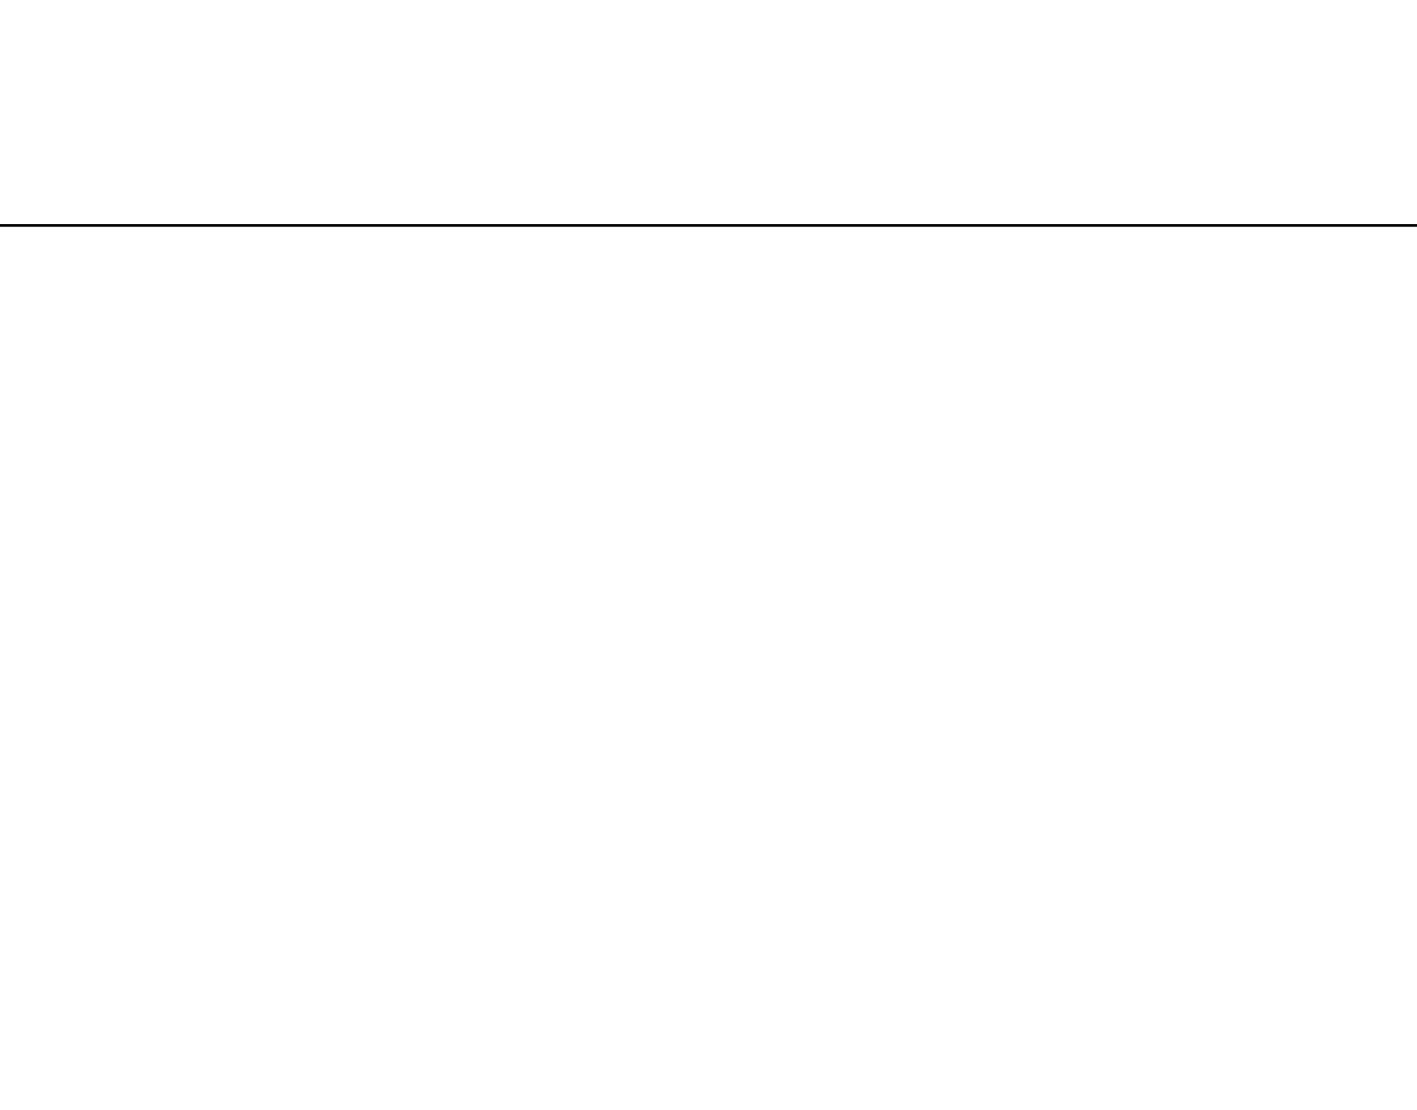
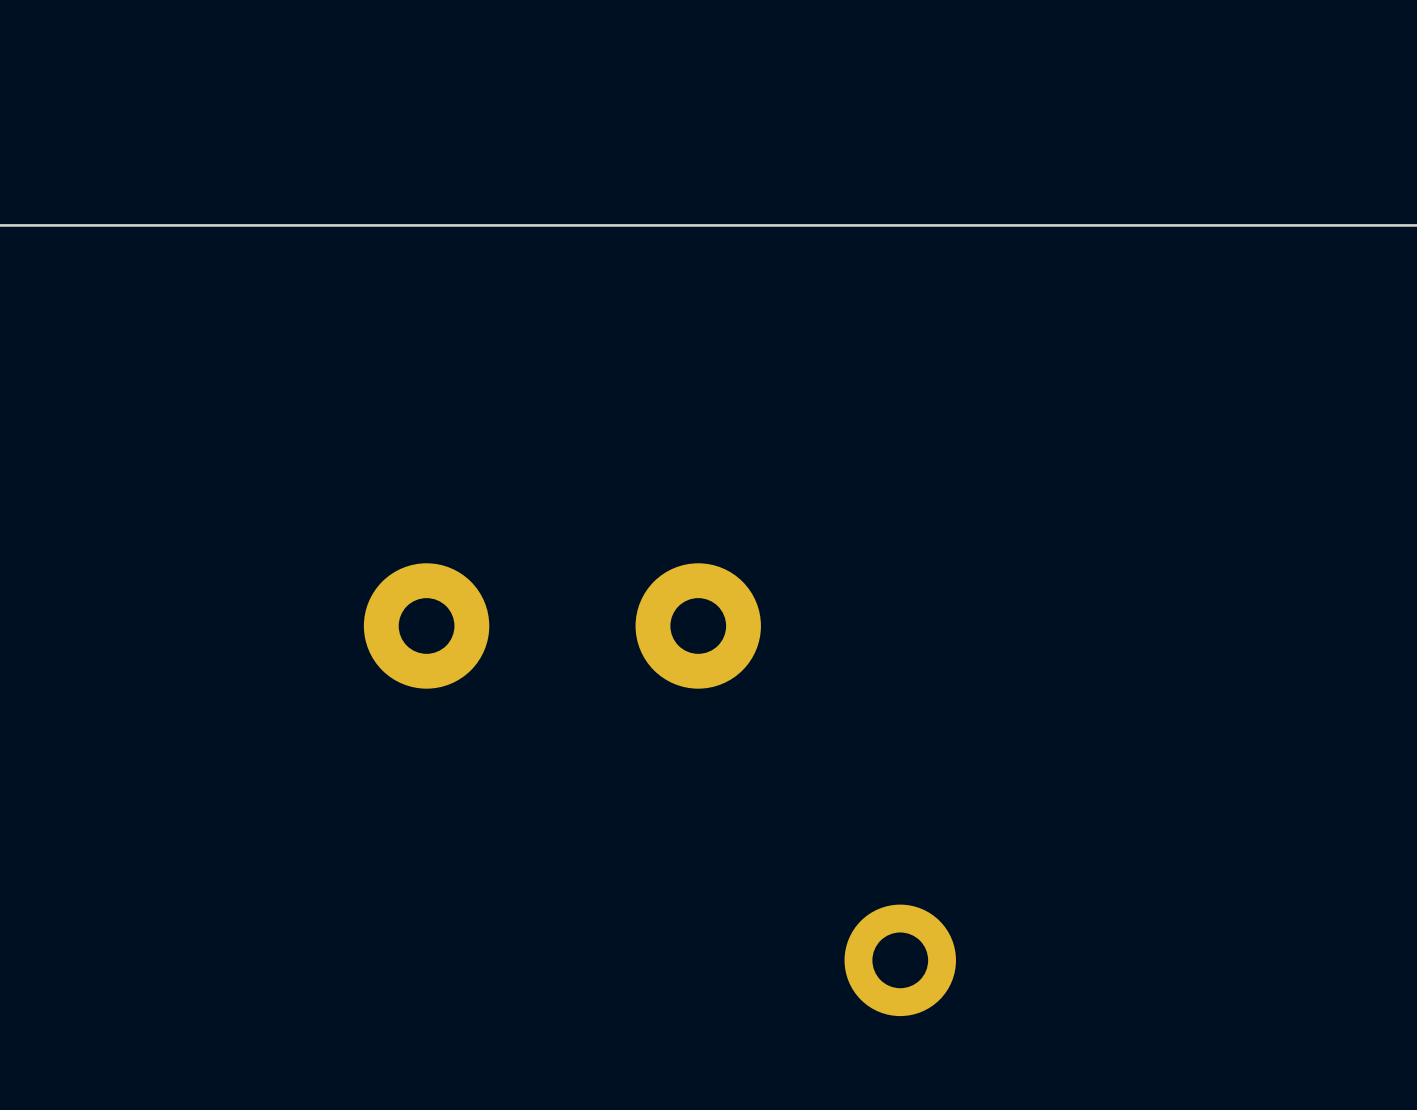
part: none -> (426, 625)
part: none -> (698, 625)
part: none -> (900, 960)

